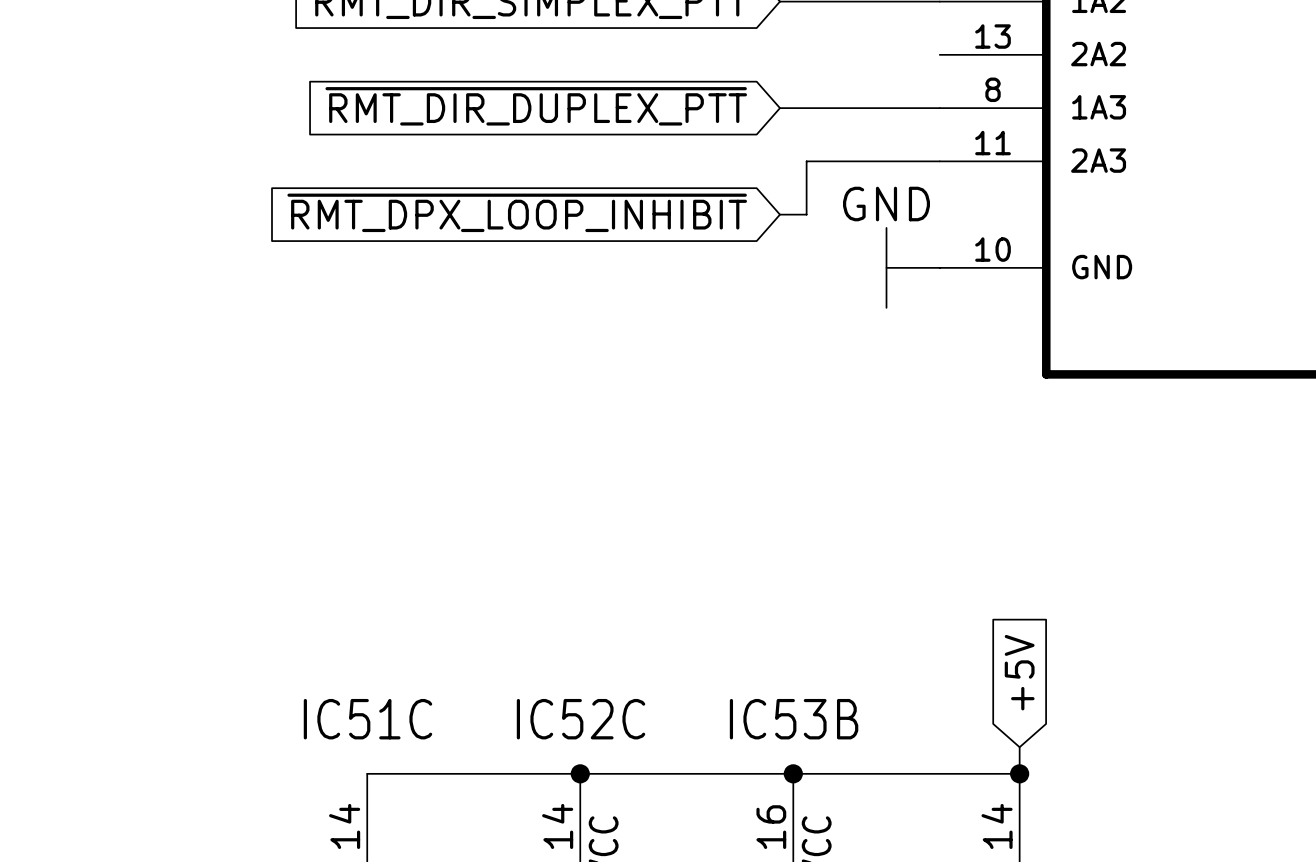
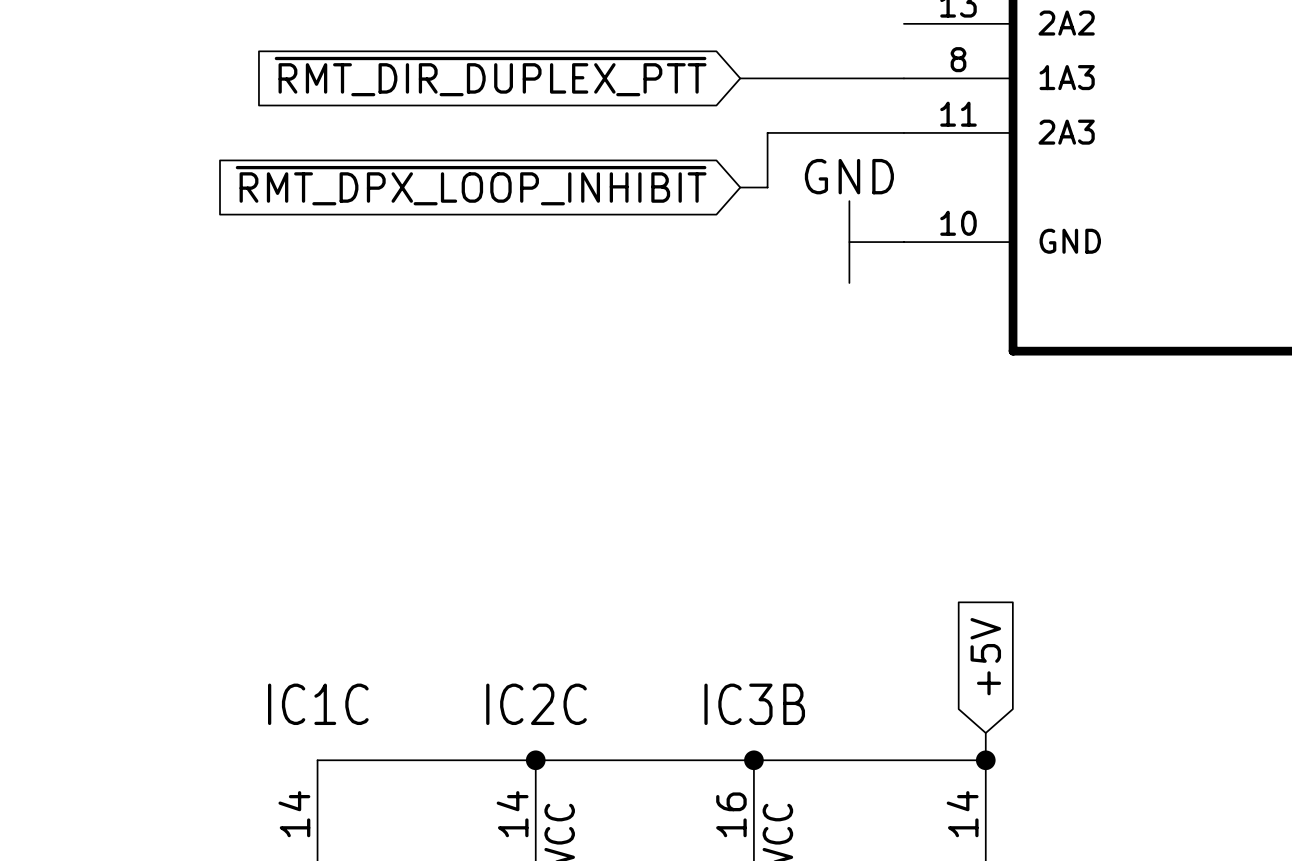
IC51C name: IC51C (367, 719) -> IC1C (318, 704)
IC52C name: IC52C (581, 719) -> IC2C (536, 704)
IC53B name: IC53B (794, 719) -> IC3B (754, 704)

